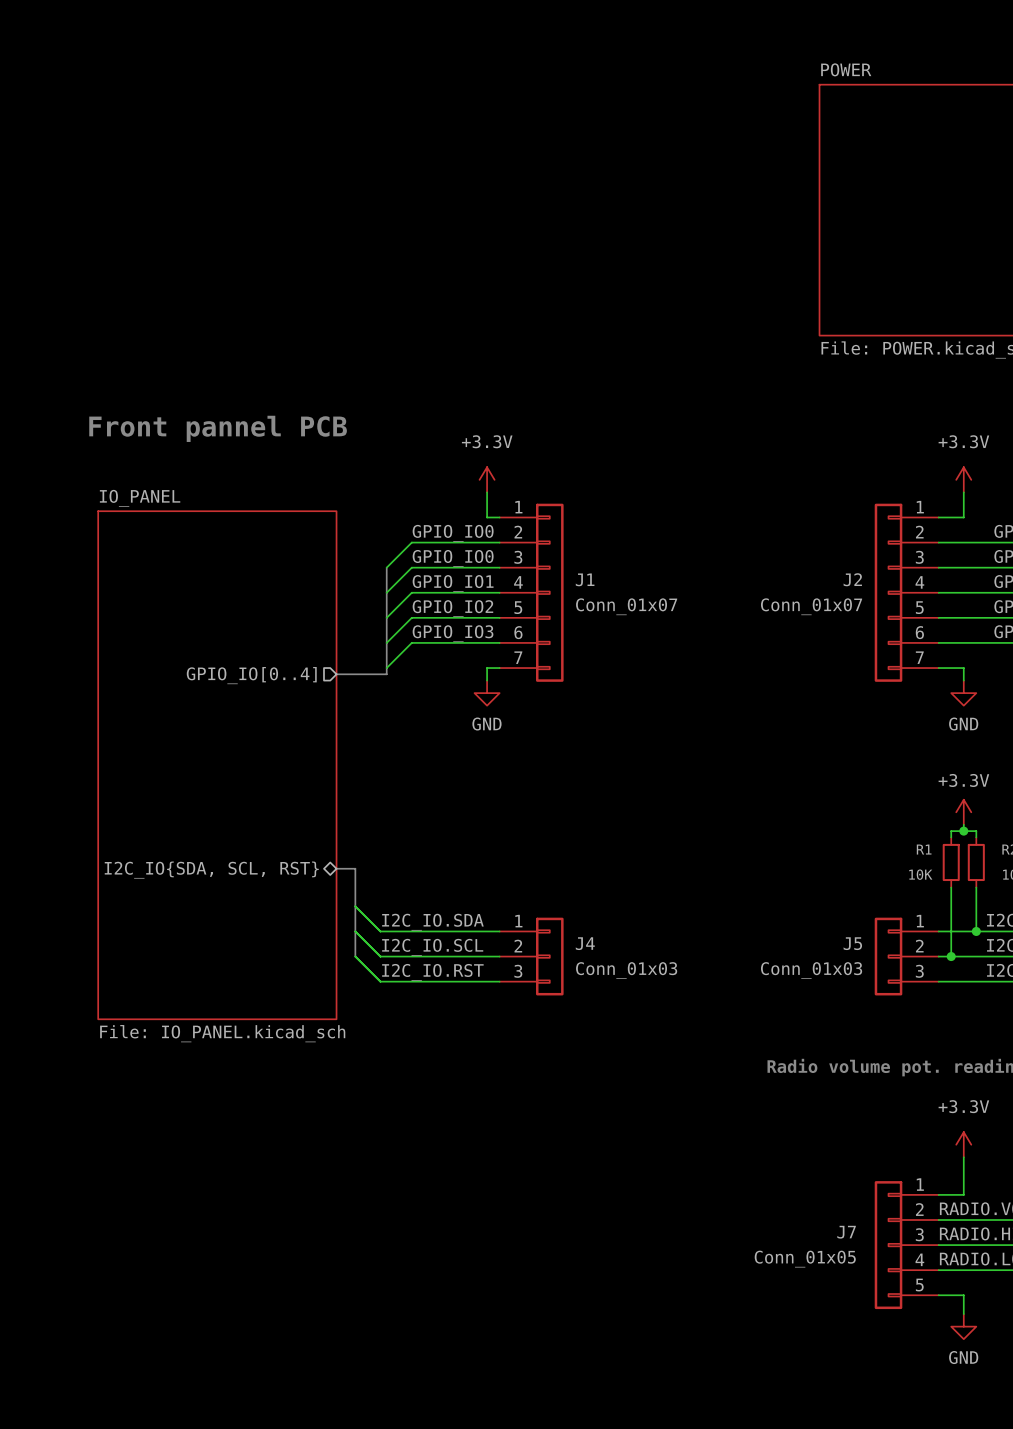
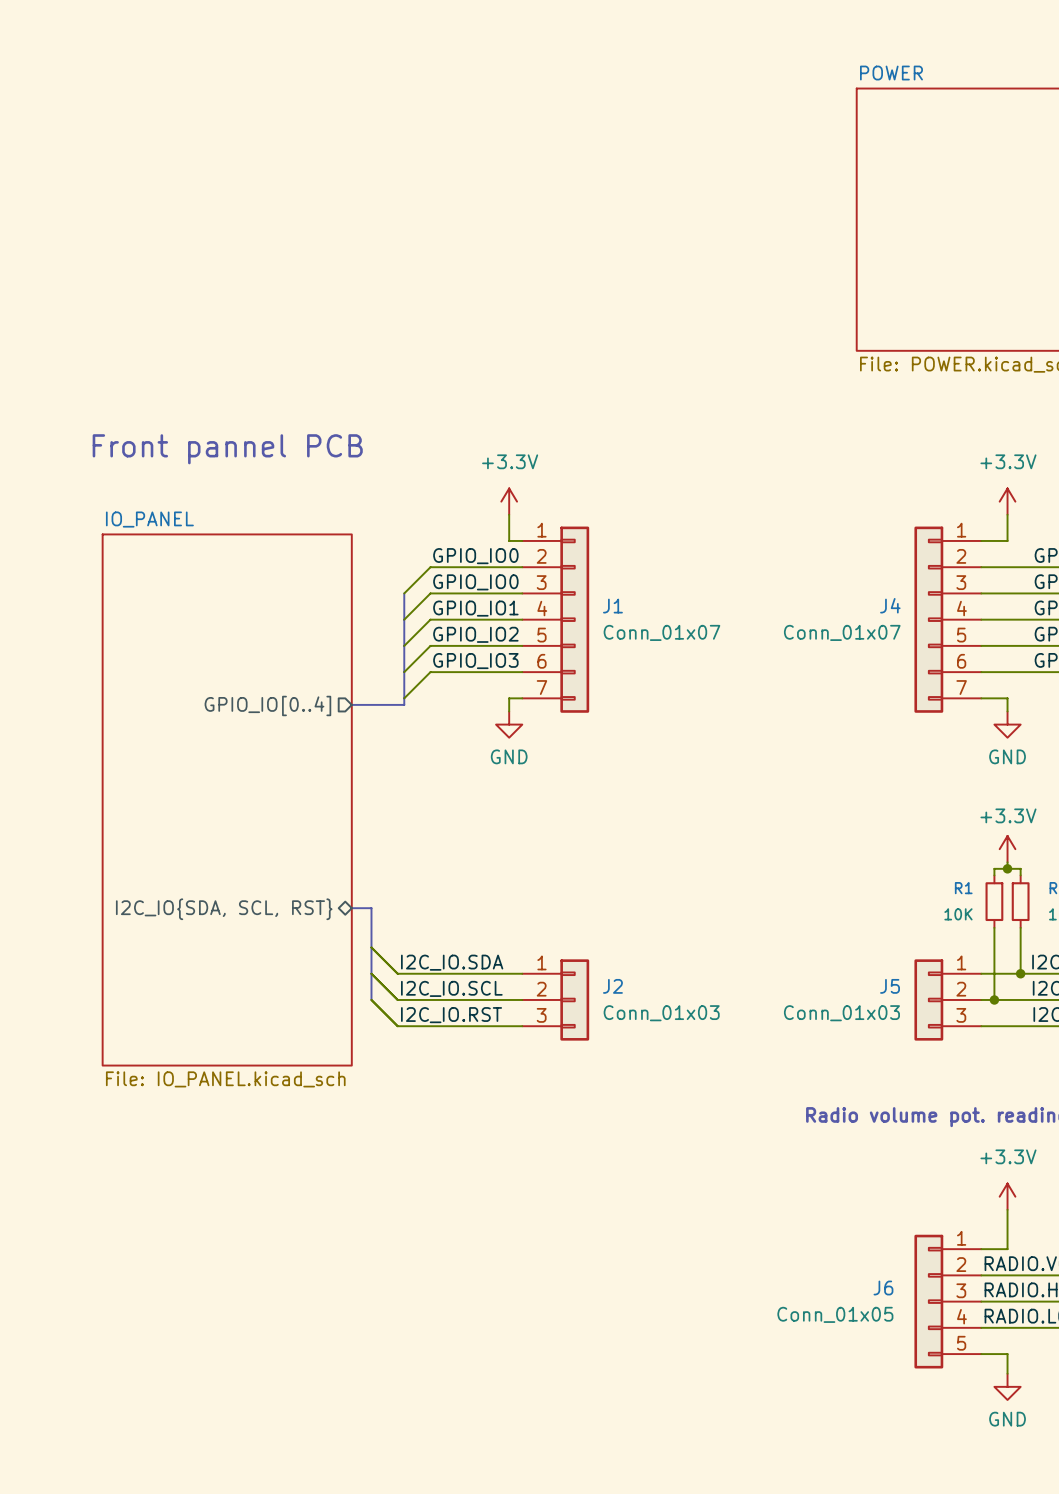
J2 name: J2 (852, 579) -> J4 (890, 605)
J4 name: J4 (585, 943) -> J2 (612, 986)
J7 name: J7 (846, 1232) -> J6 (883, 1288)

